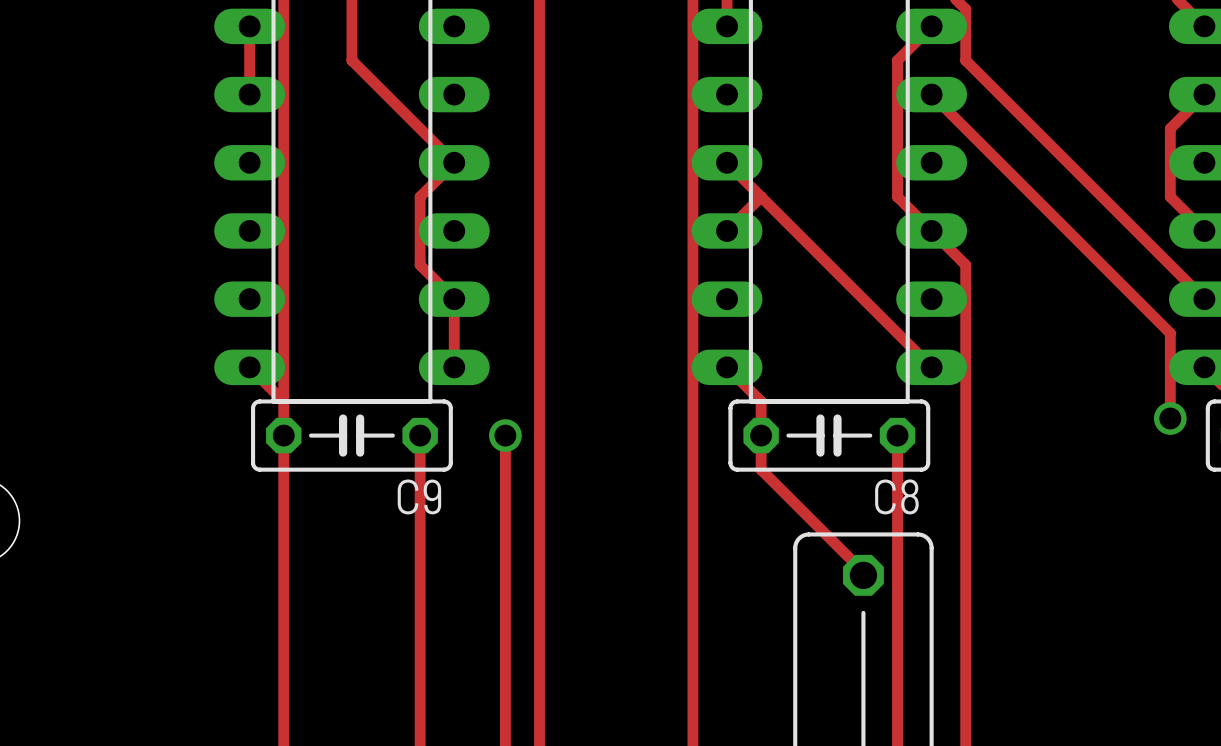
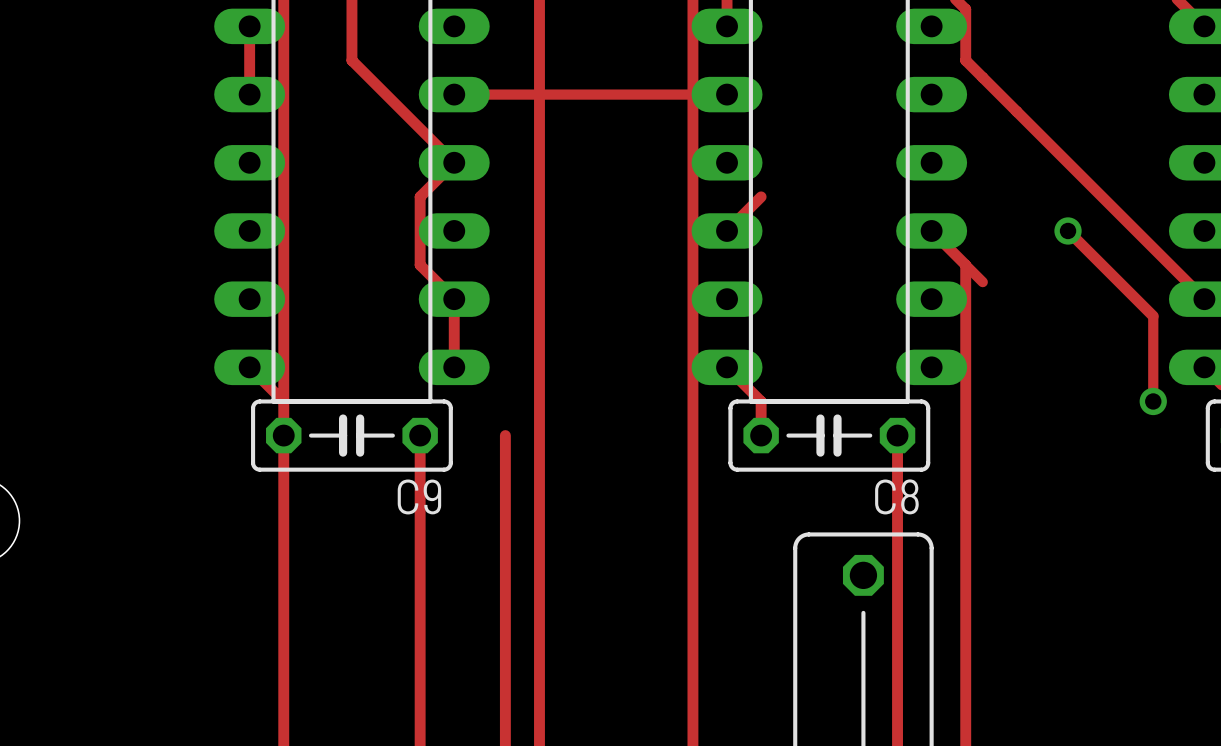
track: (931, 26) (897, 60) (897, 196) (931, 230) -> none
track: none -> (454, 94) (727, 94)
track: (931, 94) (1068, 230) -> none
track: (1204, 94) (1170, 128) (1170, 196) (1204, 230) -> none
track: (727, 162) (931, 367) -> none
via: none -> (1068, 230)
track: none -> (965, 265) (982, 282)
track: (1153, 316) (1170, 333) (1170, 418) -> (1153, 316) (1153, 401)
via position: (1170, 418) -> (1153, 401)
via: (505, 435) -> none
track: (761, 435) (761, 469) (863, 571) (863, 575) -> none

